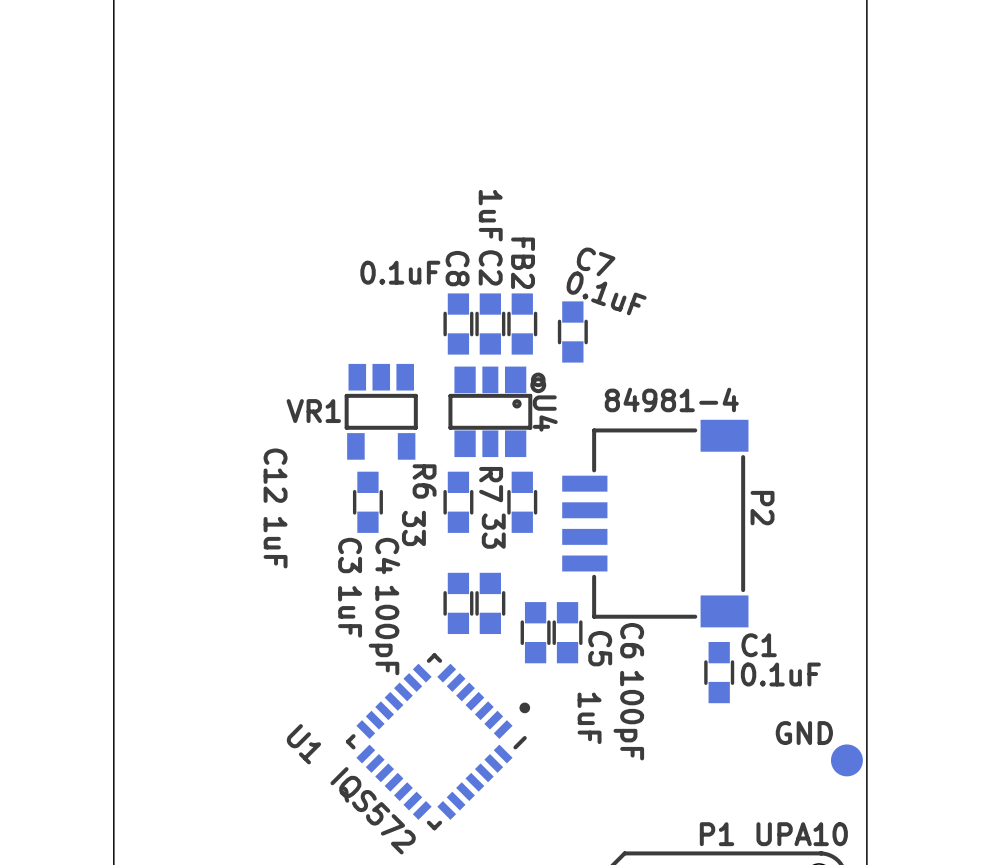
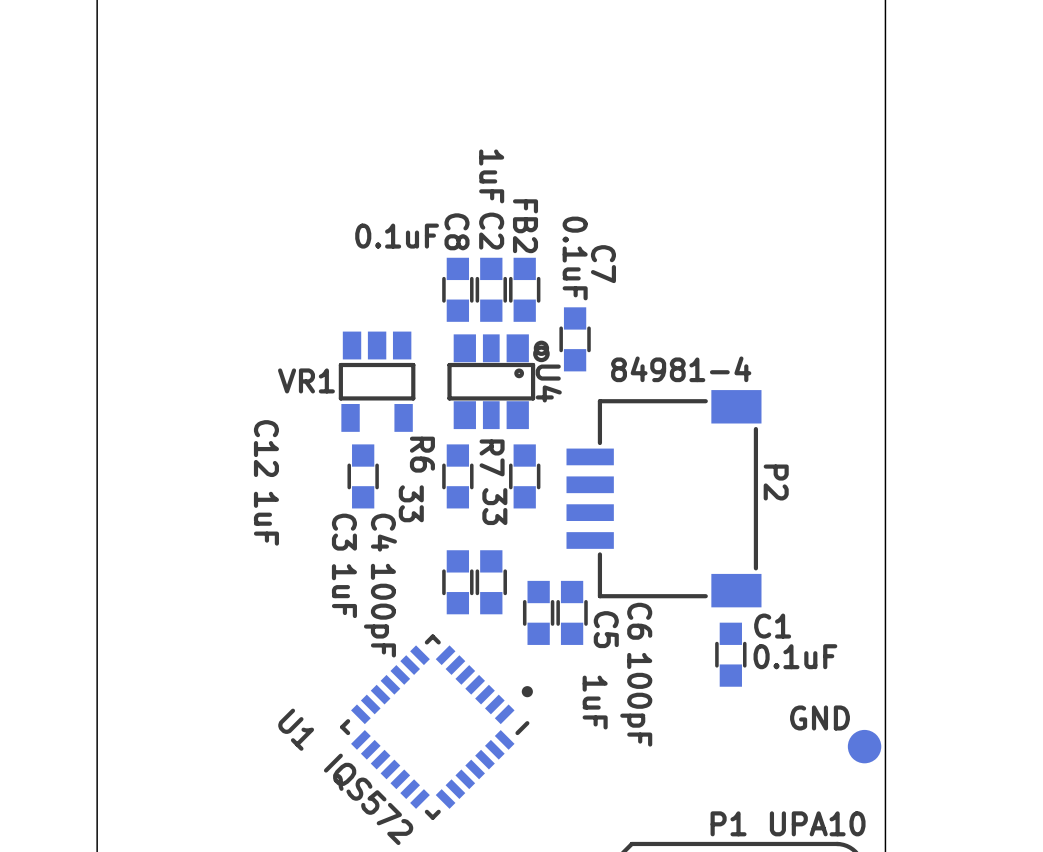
C7 name rotation: 0° (596, 261) -> 70° clockwise (603, 264)
C7 value rotation: 0° (606, 293) -> 70° clockwise (575, 258)
C7 position: (572, 331) -> (575, 339)

